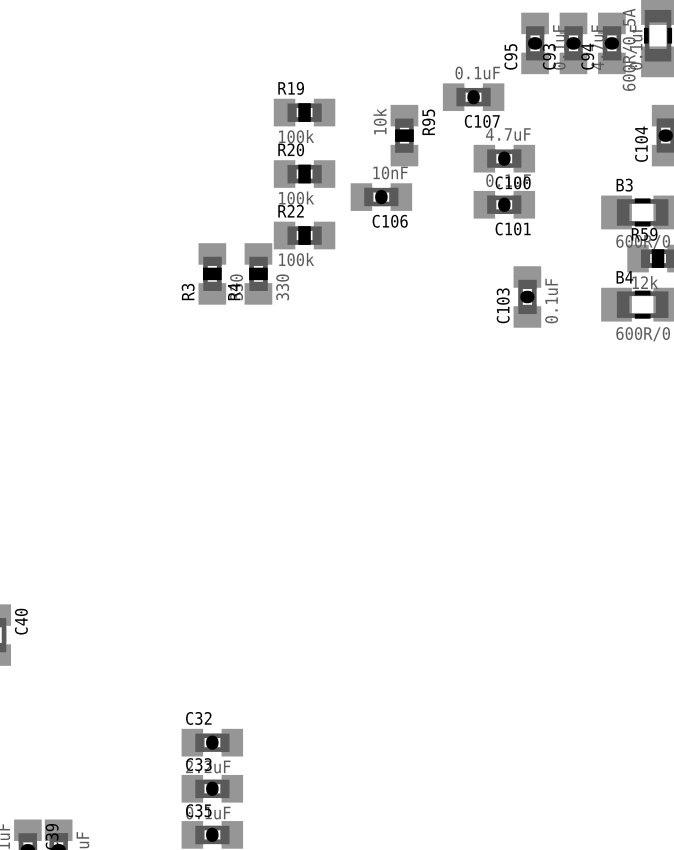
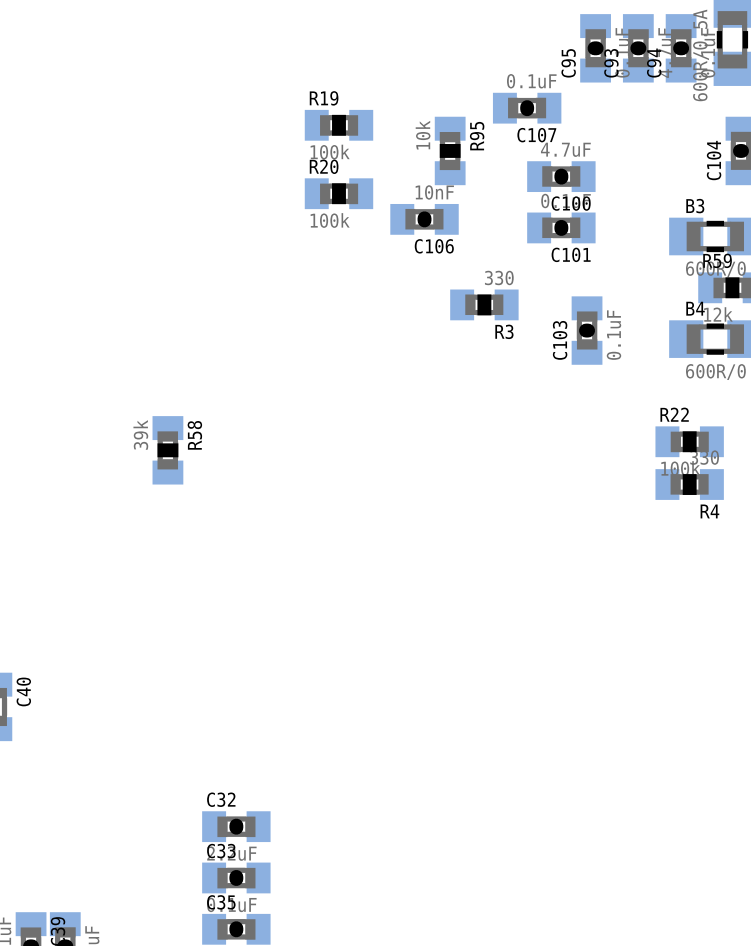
R22 position: (304, 235) -> (689, 441)
R3 rotation: 0° (212, 273) -> 90° clockwise (484, 304)
R3 position: (212, 273) -> (484, 304)
R4 rotation: 0° (258, 273) -> 90° clockwise (689, 484)
R4 position: (258, 273) -> (689, 484)
R58: none -> 39k (167, 450)

